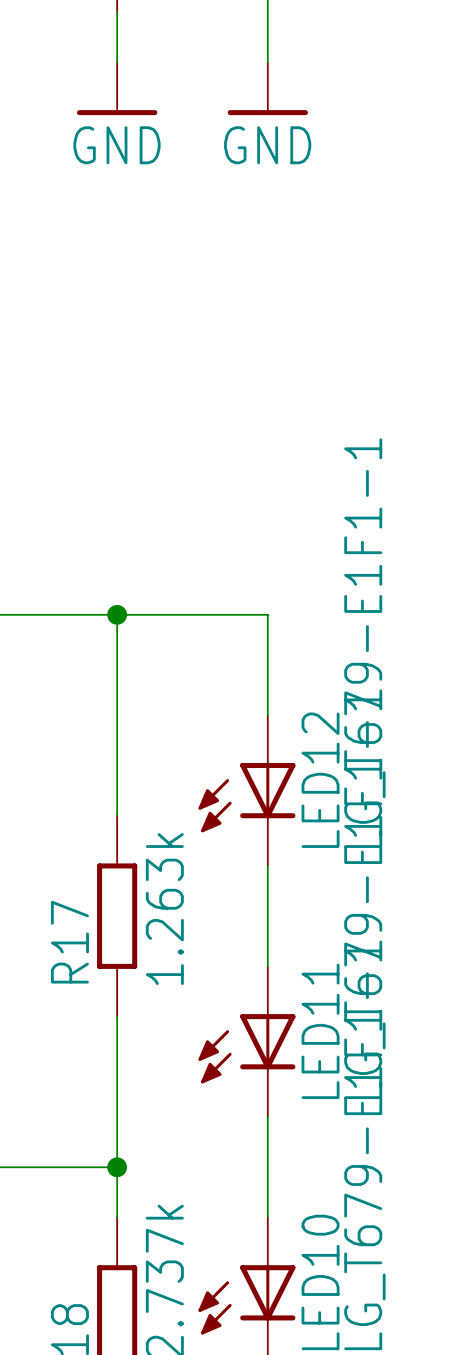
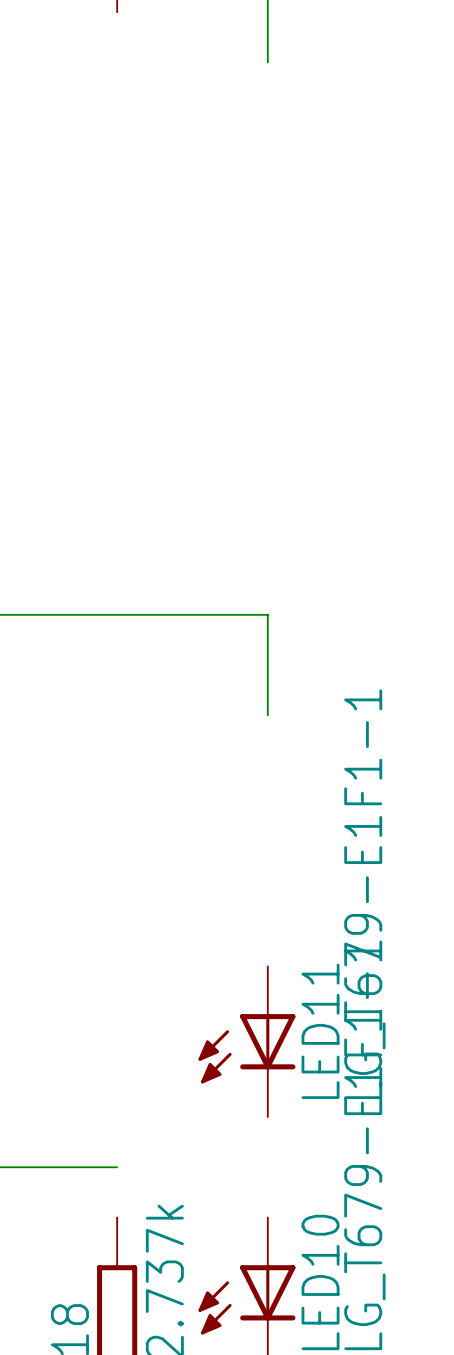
wire: (117, 12) (117, 62) -> none
power symbol: GND (117, 88) -> none
power symbol: GND (267, 88) -> none
wire: (117, 614) (117, 815) -> none
junction: (117, 614) -> none
LED12: LG_T679-E1F1-1 (246, 790) -> none
wire: (267, 865) (267, 966) -> none
R17: 1.263k (117, 916) -> none
wire: (117, 1016) (117, 1217) -> none
wire: (267, 1117) (267, 1217) -> none
junction: (117, 1167) -> none

